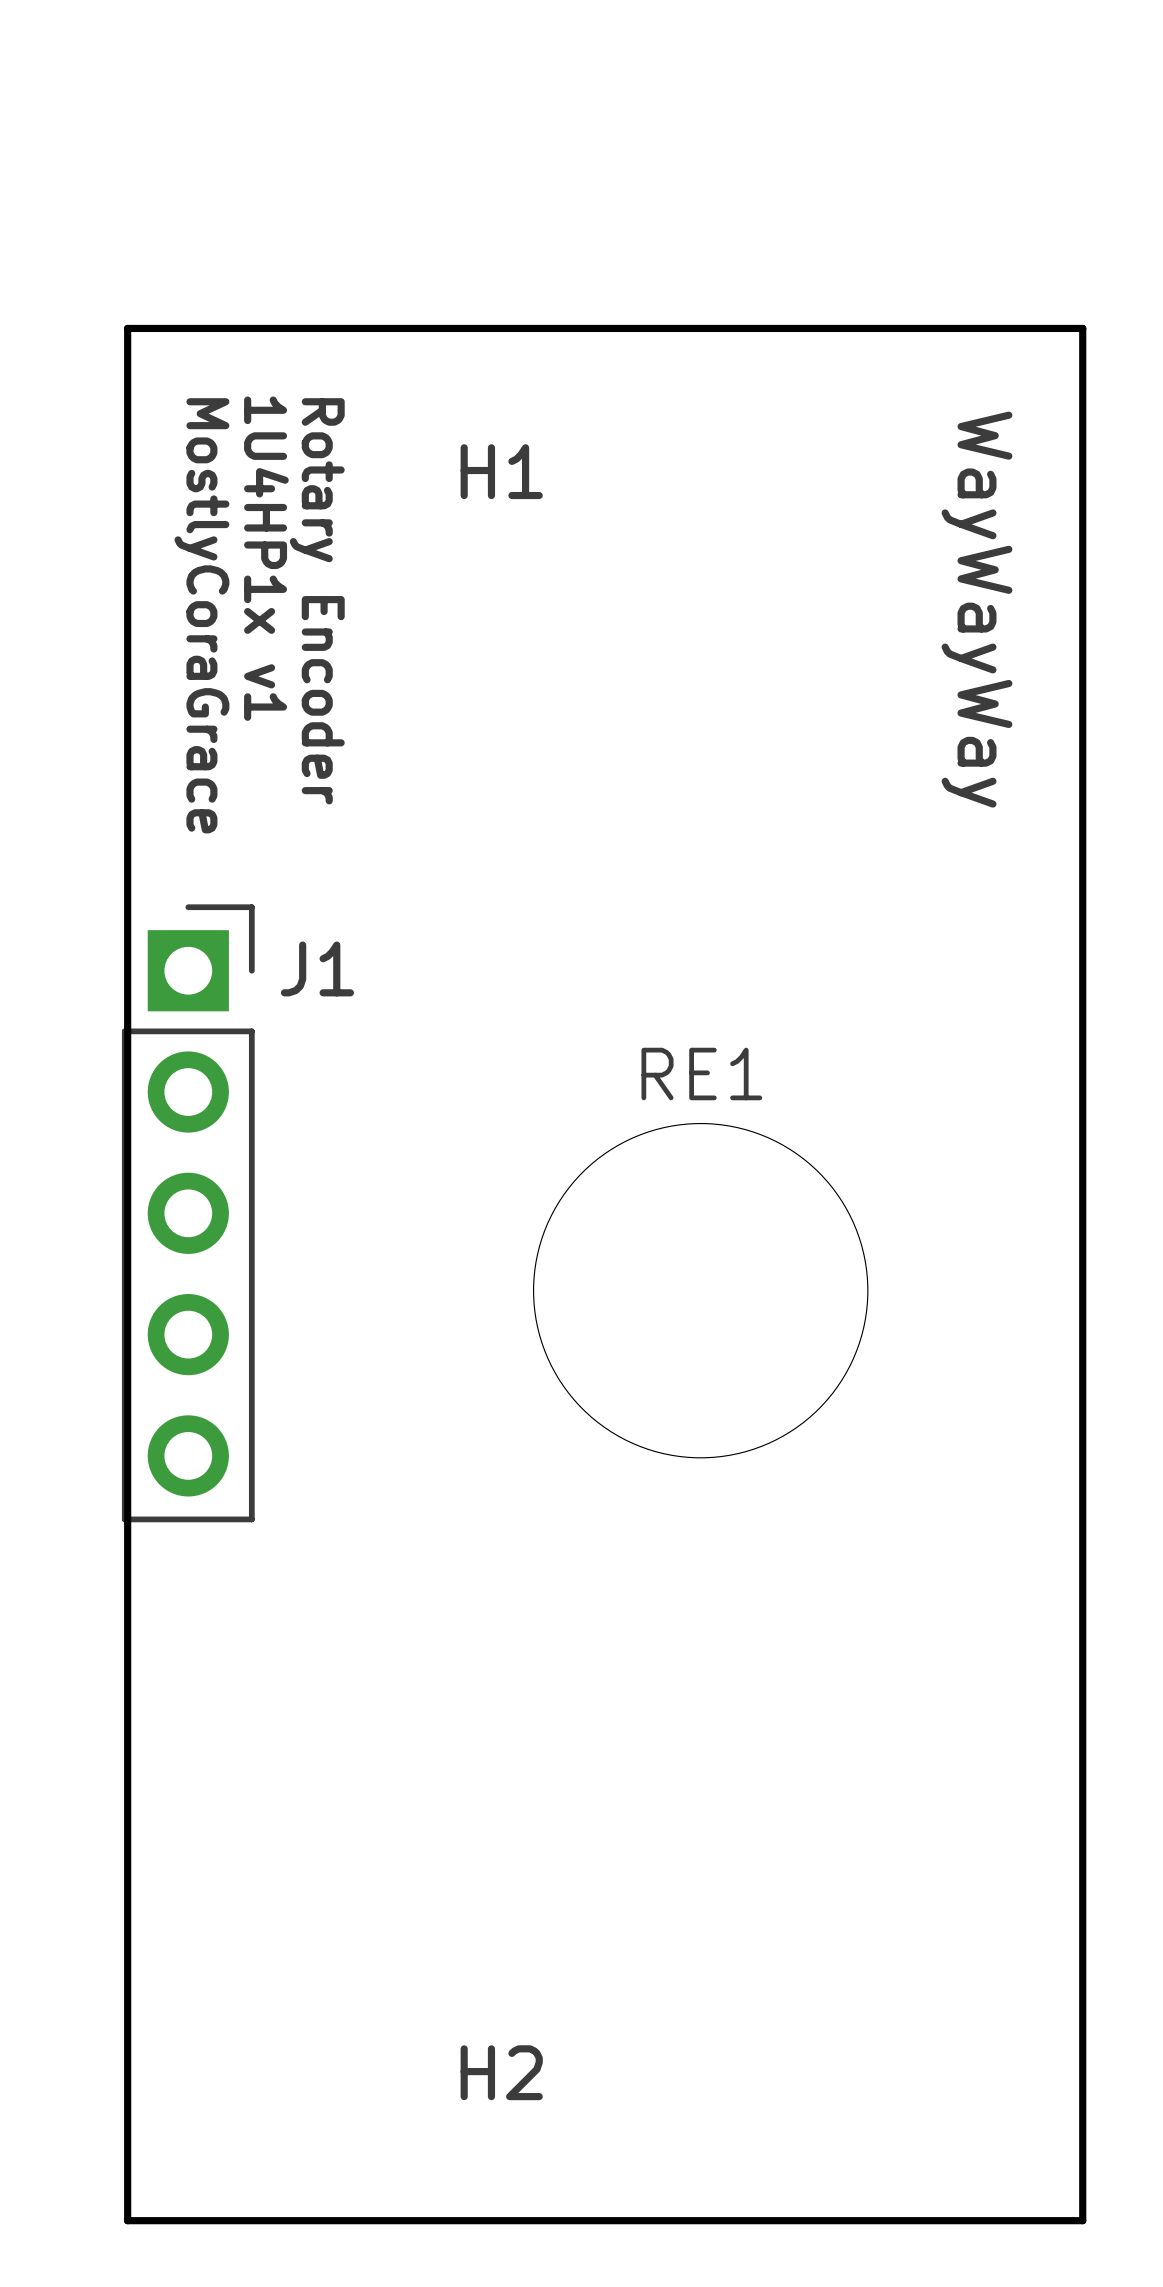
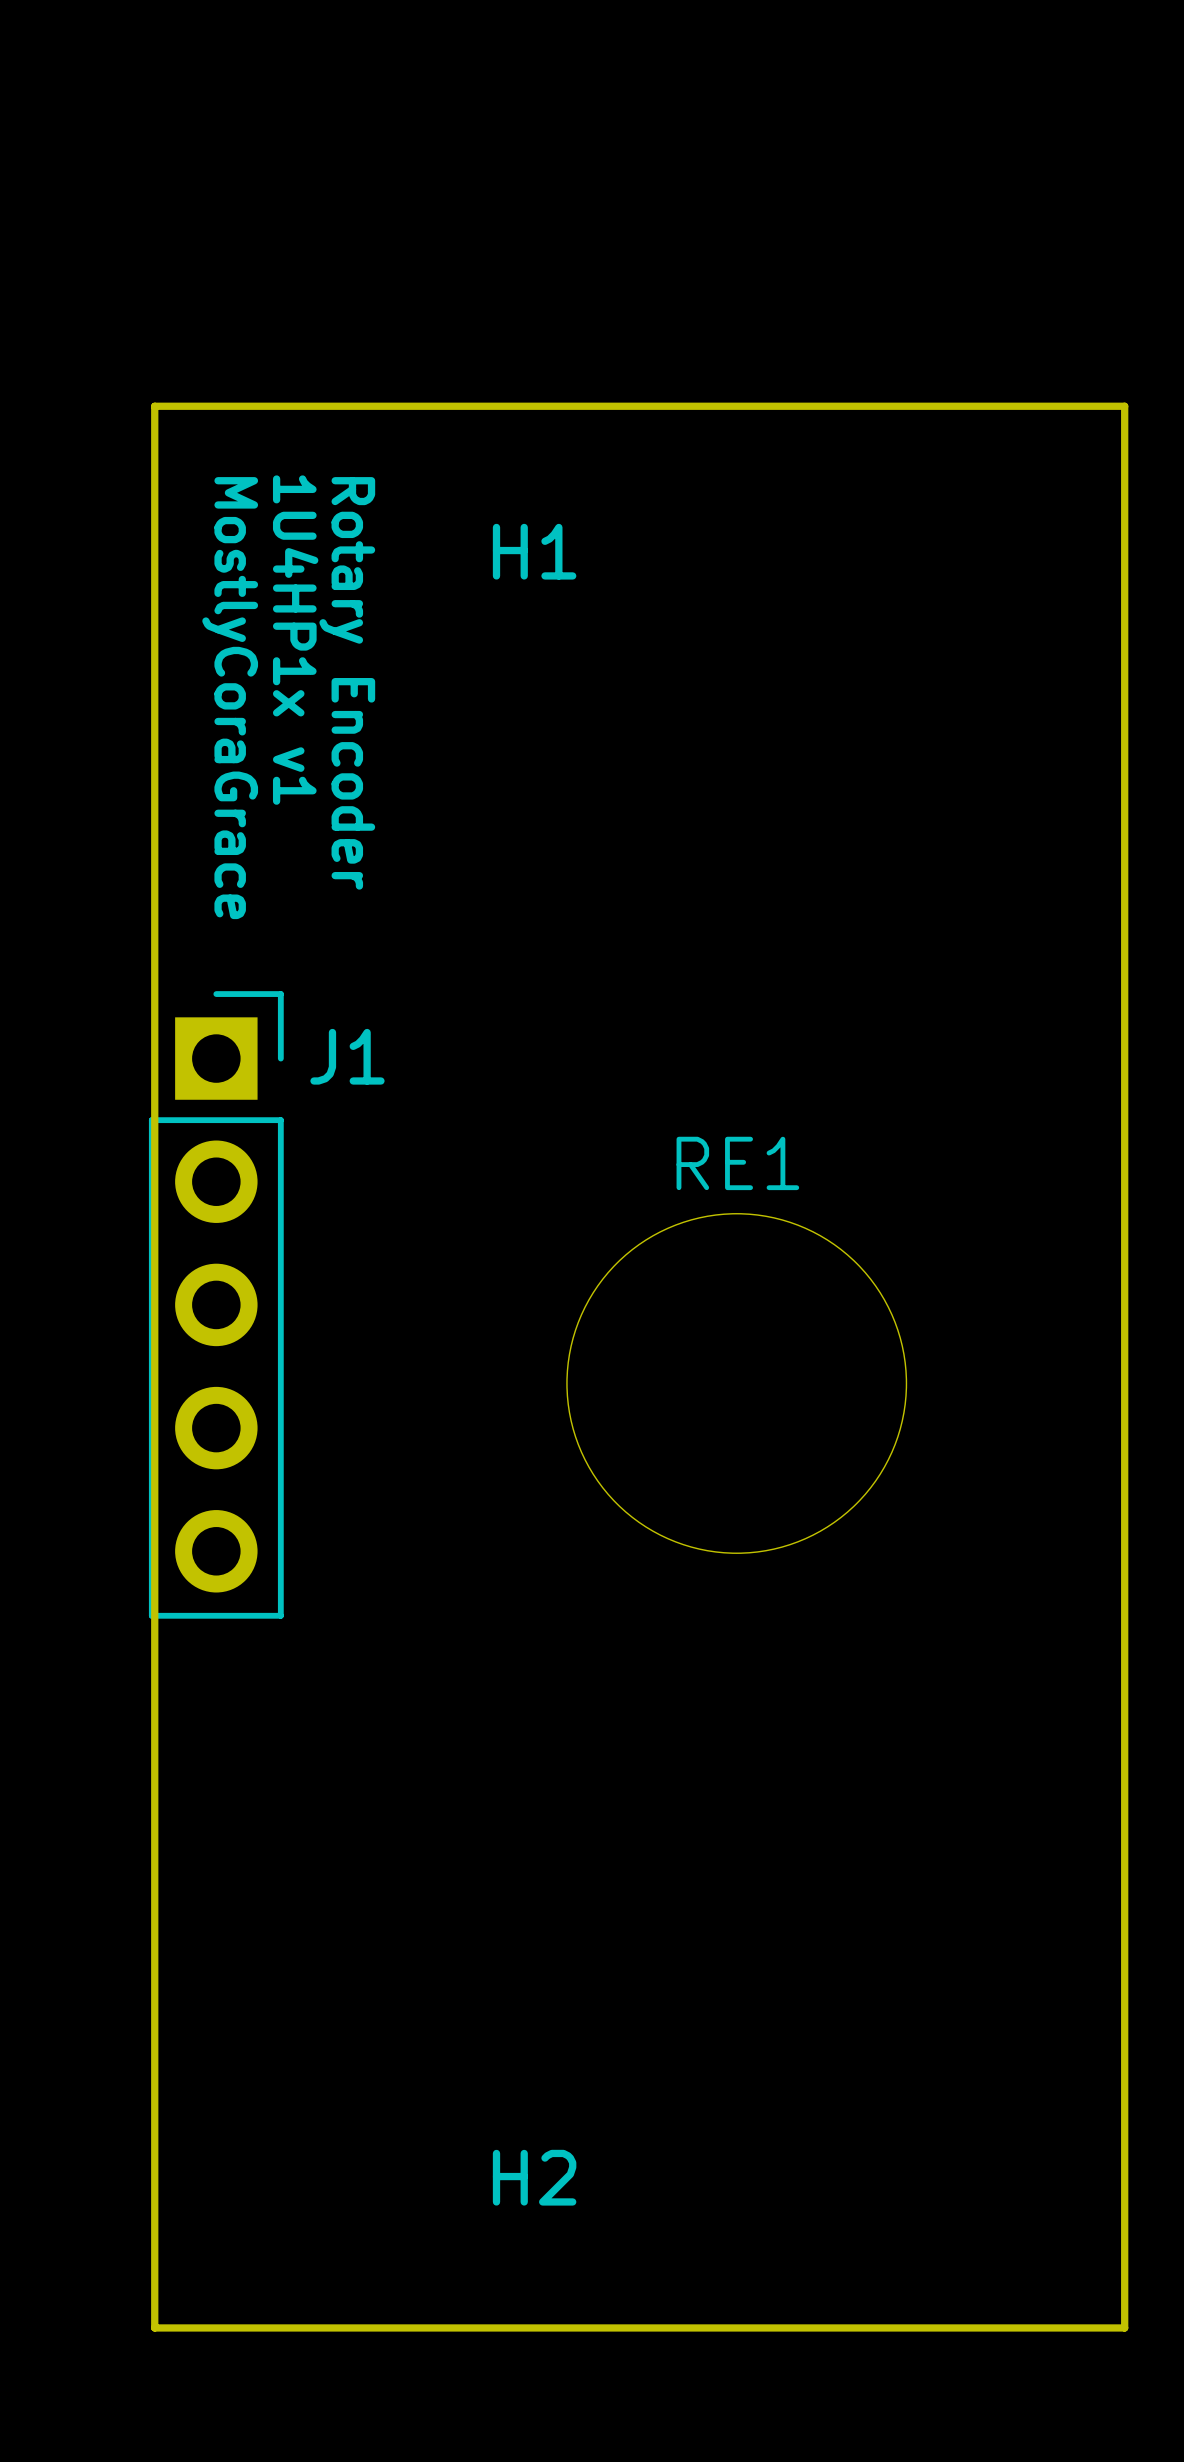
text: WayWayWay (976, 609) -> none

